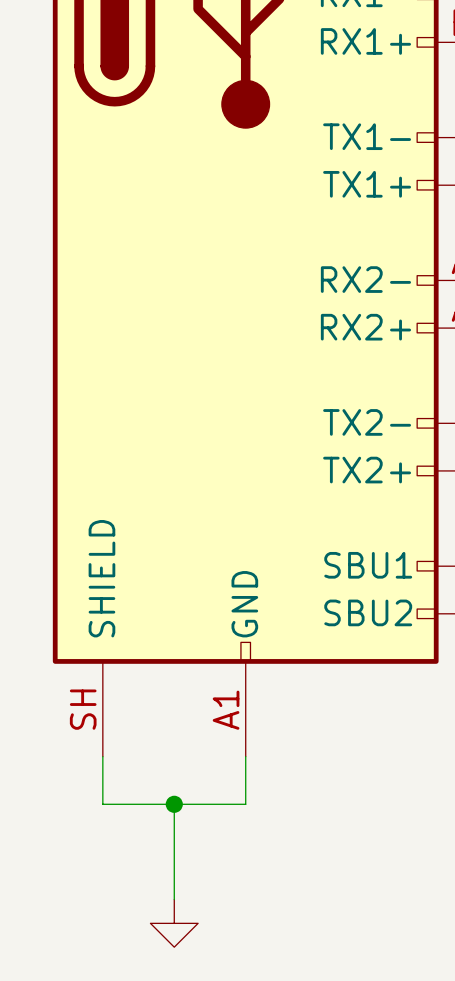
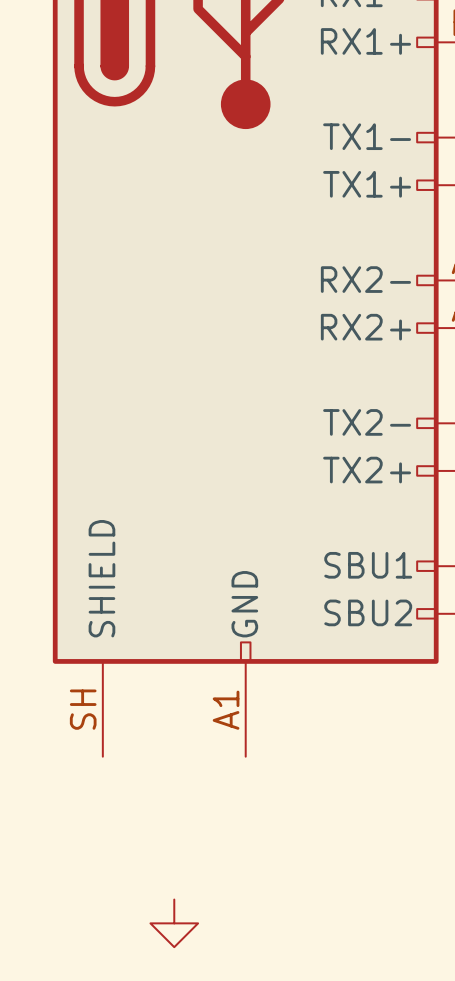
wire: (102, 756) (102, 804) (245, 804) (245, 756) -> none
wire: (174, 804) (174, 899) -> none
junction: (174, 804) -> none

